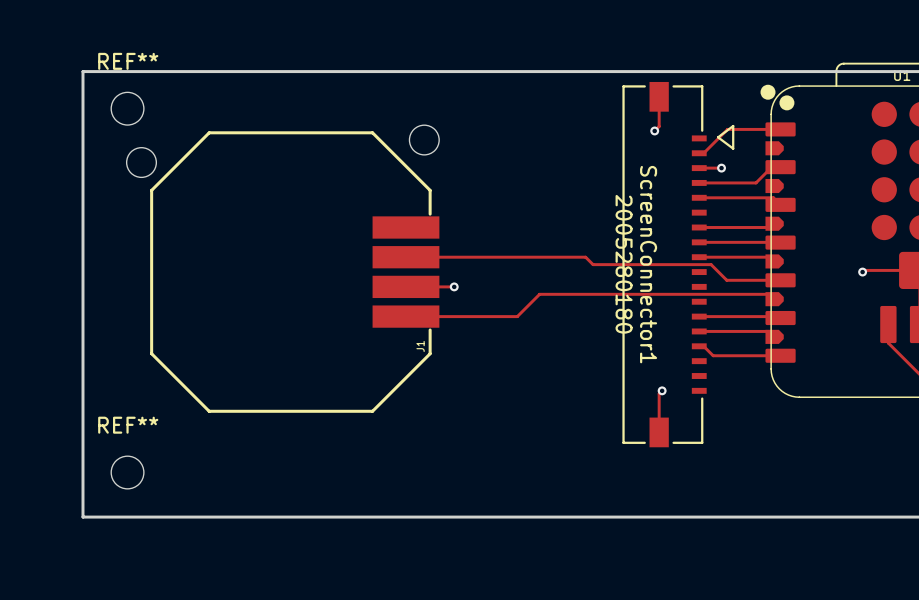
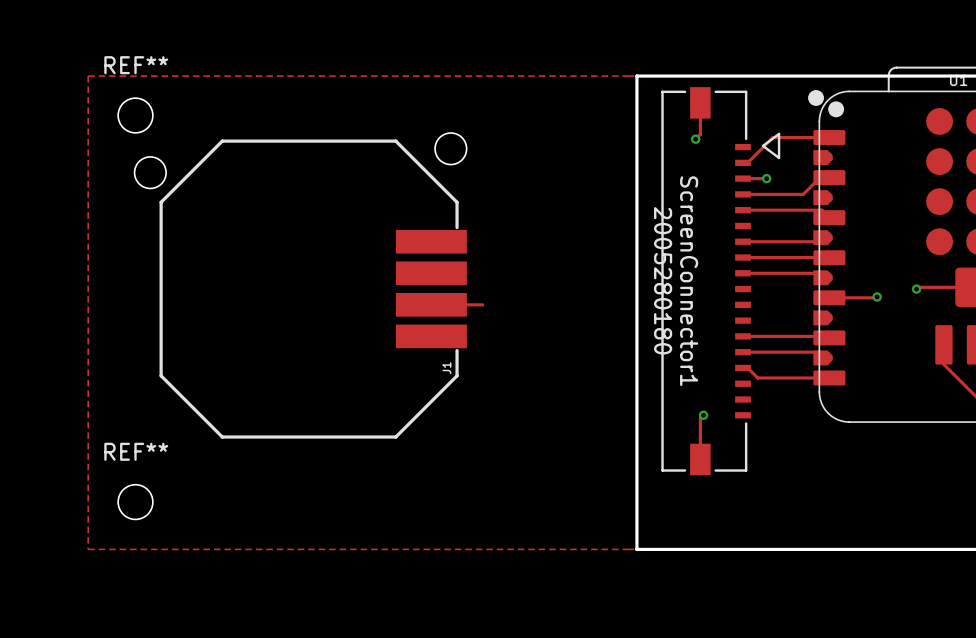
board edge: (599, 71) (82, 71) (82, 517) (599, 517) -> (636, 76) (636, 549)
track: (405, 257) (585, 257) (593, 264) (711, 264) (726, 280) (780, 280) -> (877, 296) (829, 297)
via: none -> (877, 296)
via: (454, 286) -> none
track: (769, 294) (539, 294) (517, 316) (405, 316) -> none

